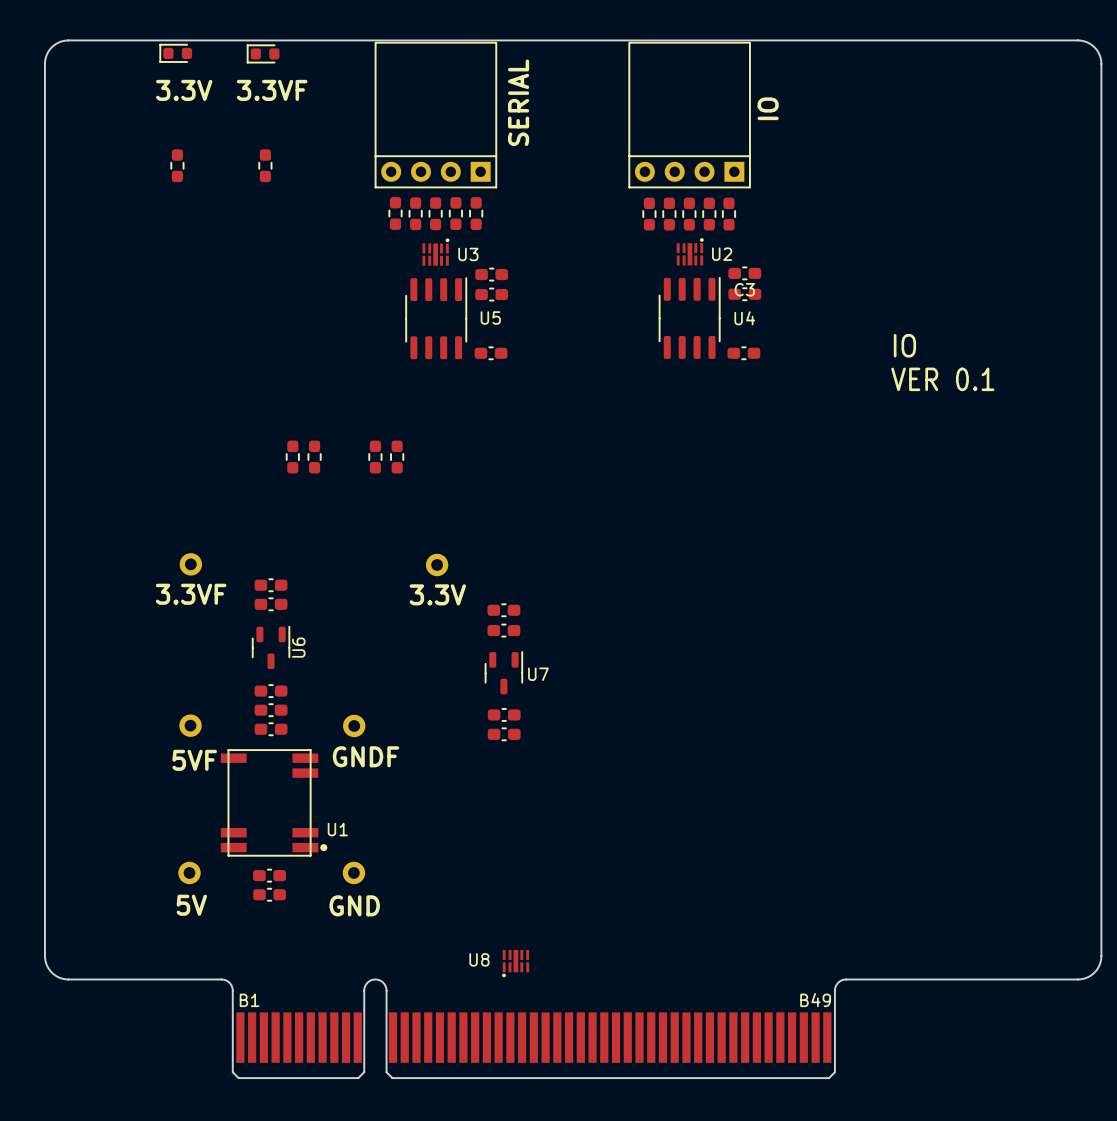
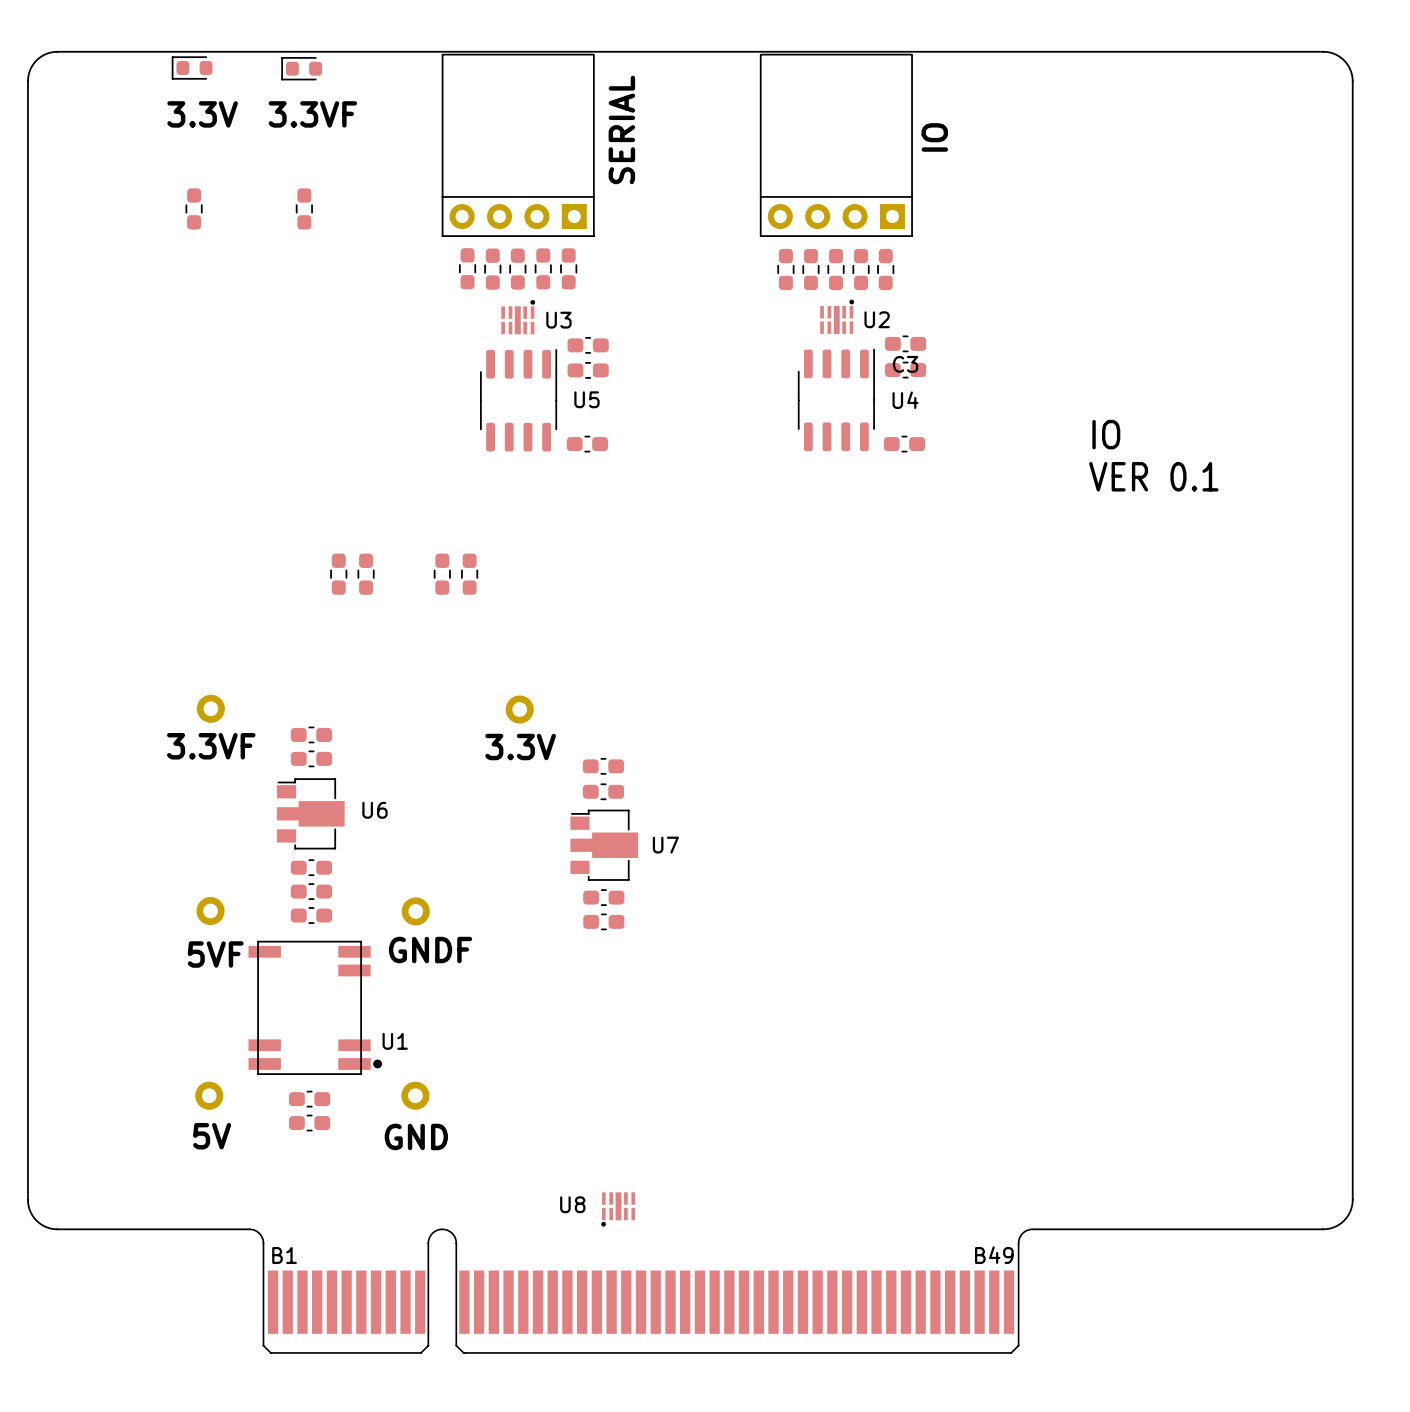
U6 footprint: [252, 626, 291, 669] -> [276, 778, 345, 850]
U7 footprint: [484, 651, 523, 695] -> [570, 809, 639, 881]

